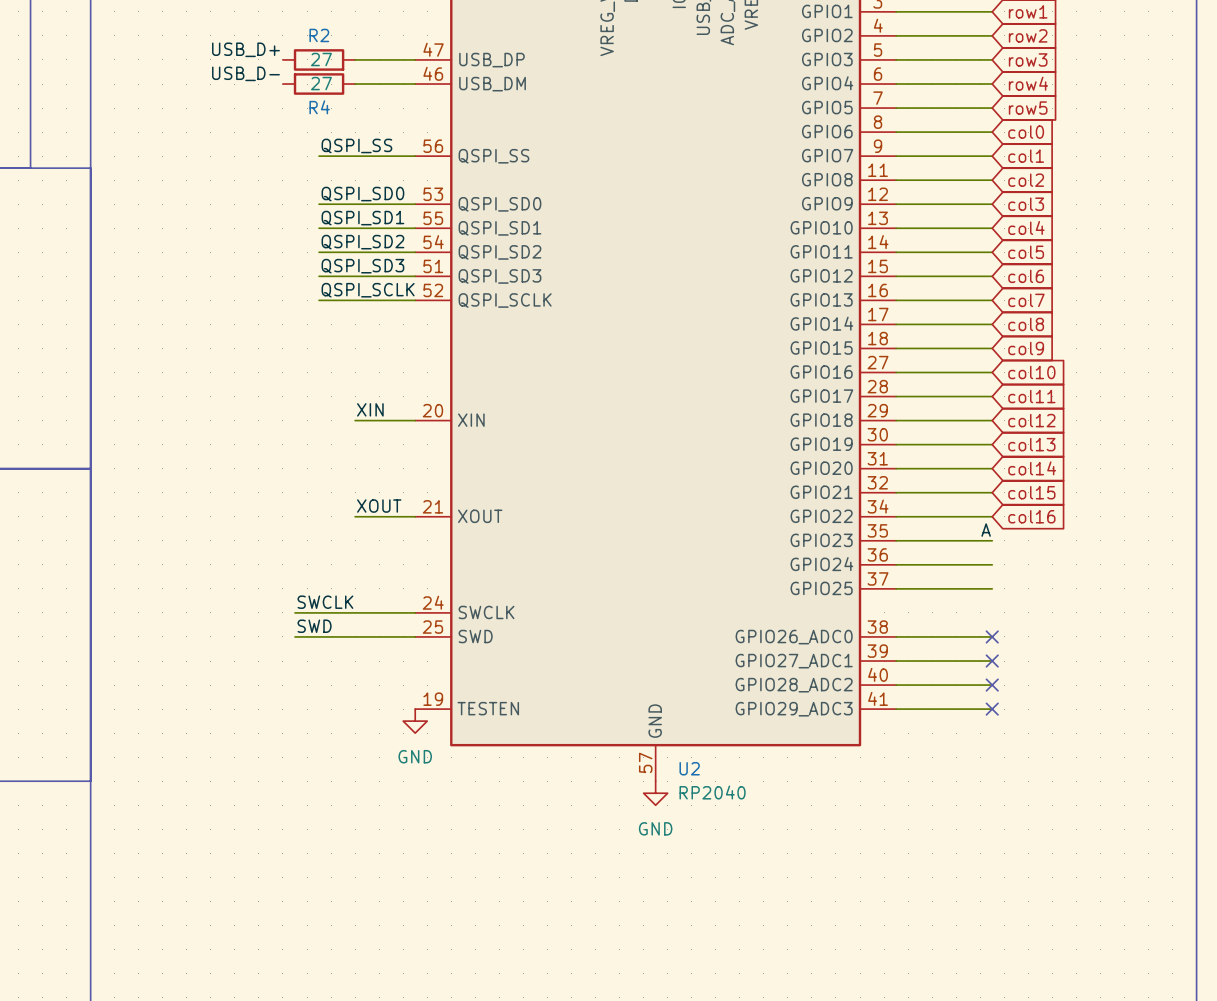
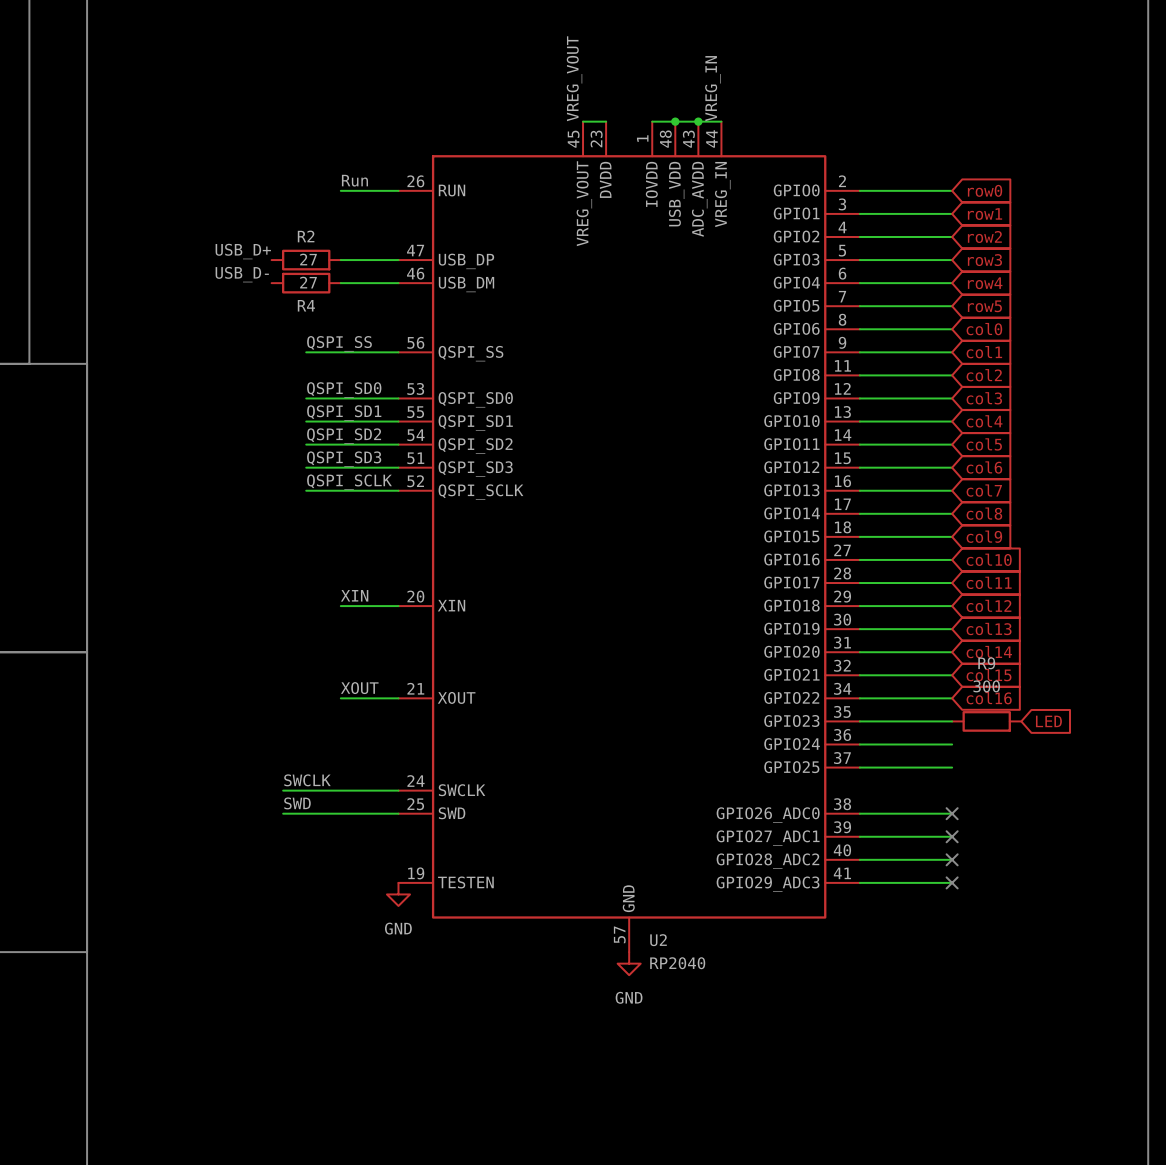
label: A (986, 530) -> none
R9: none -> 300 (986, 721)
global label: none -> LED (1048, 721)

